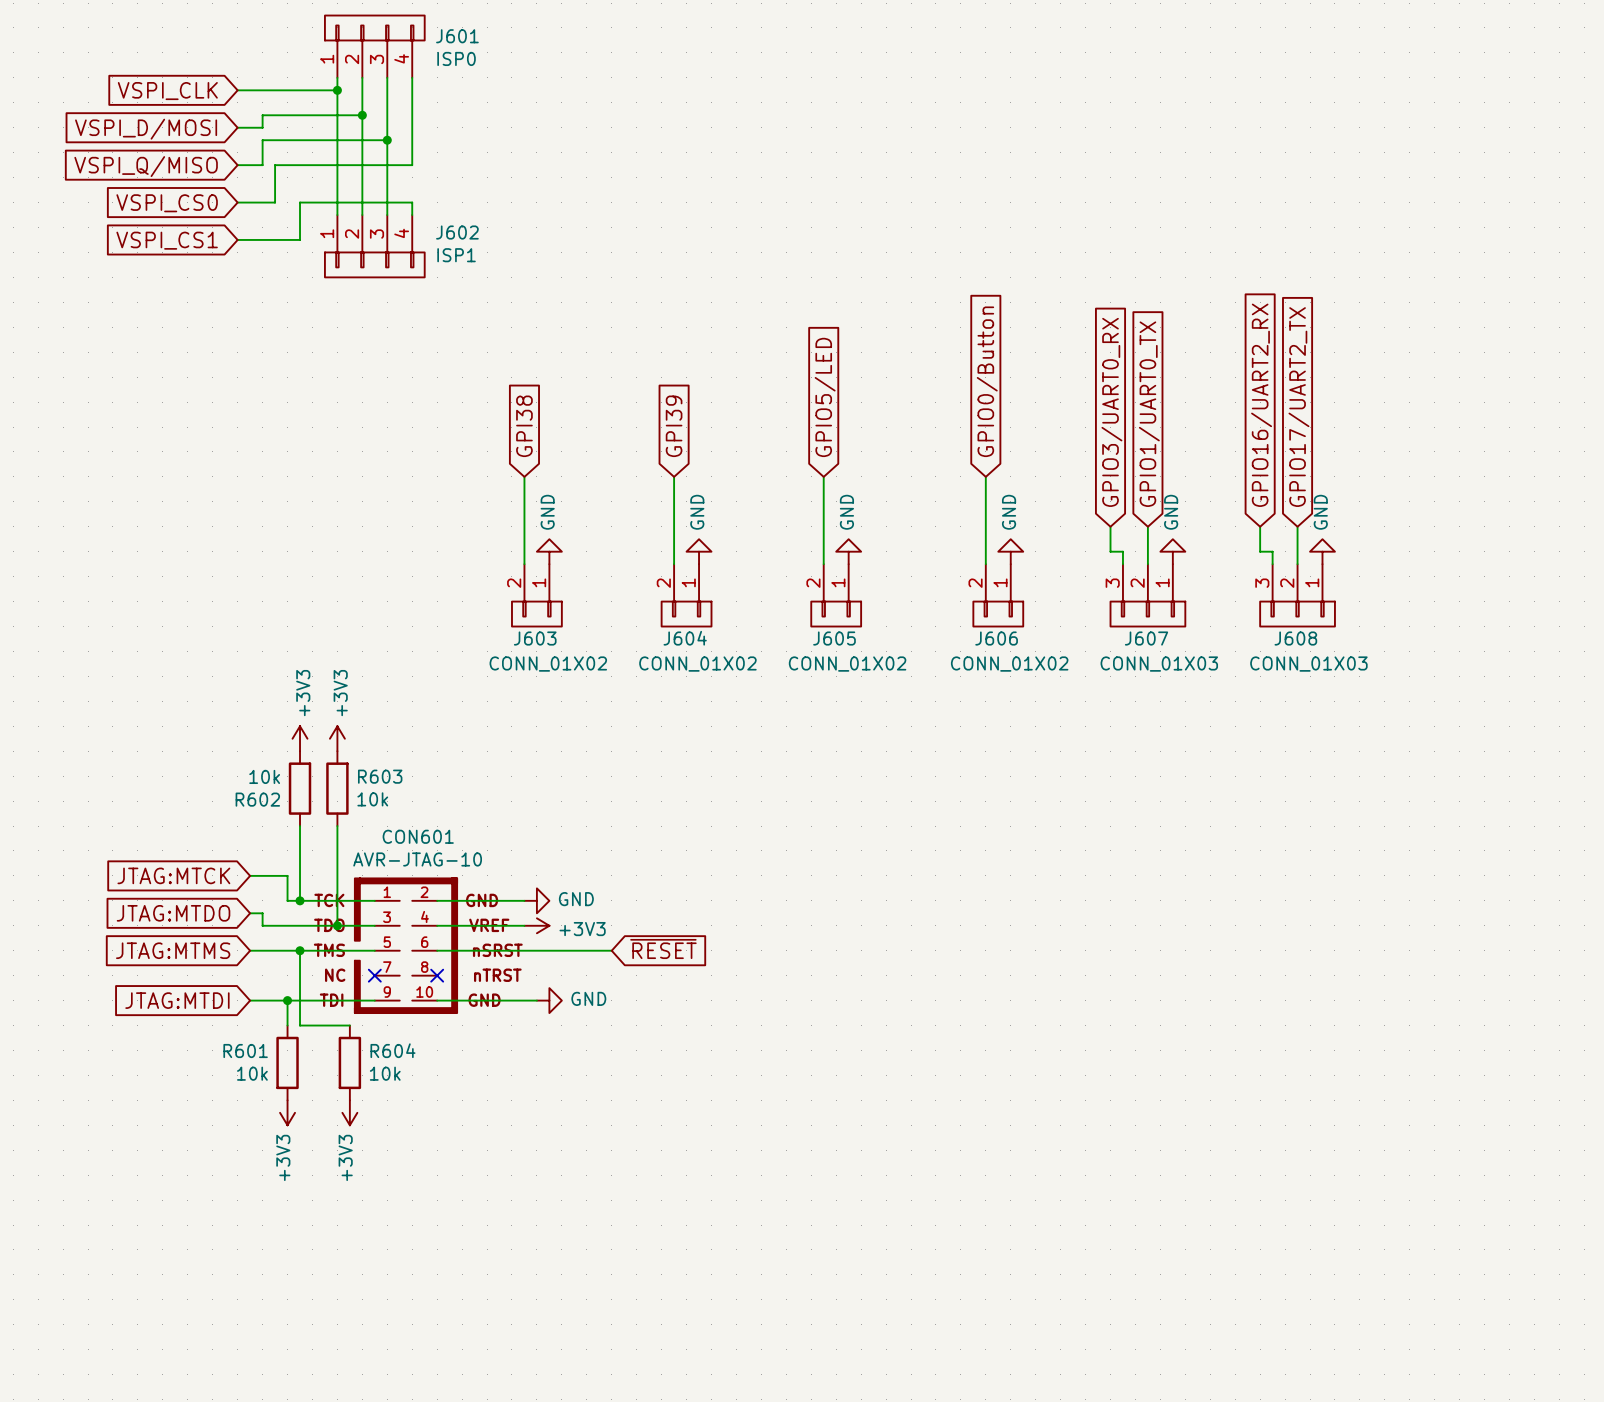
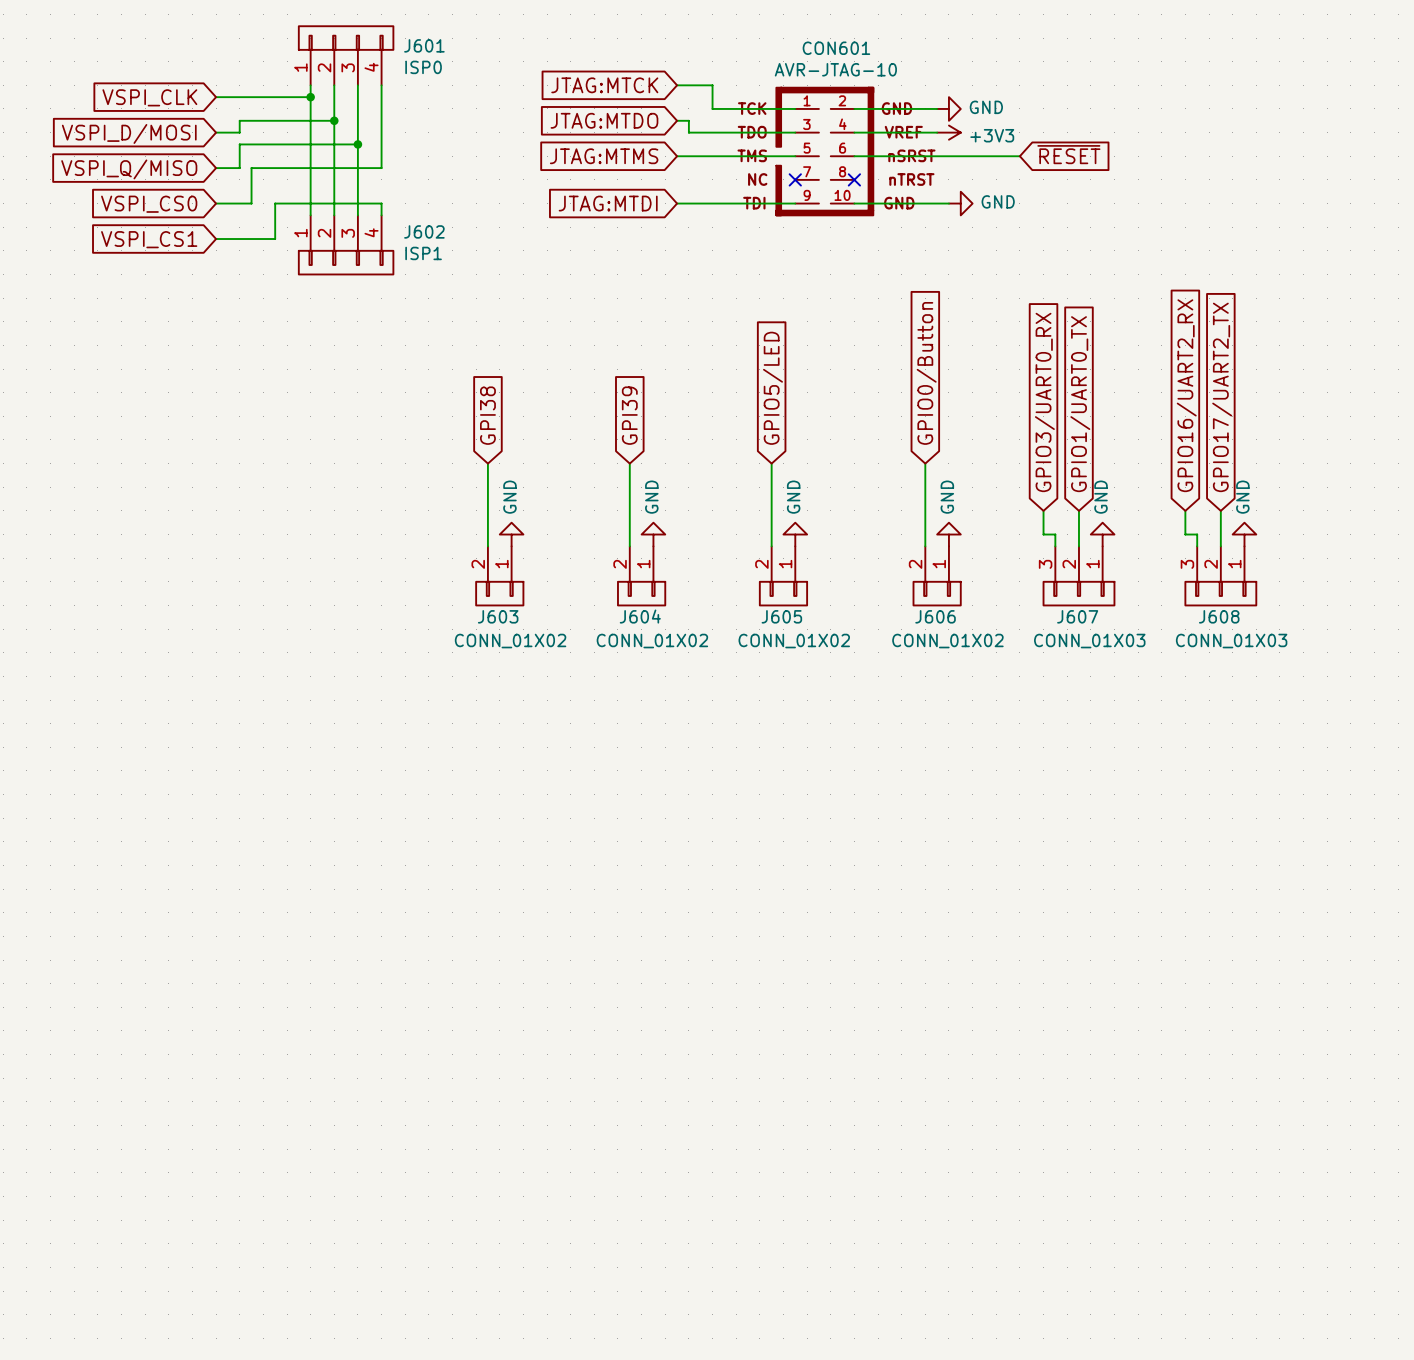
global label: none -> JTAG:MTCK (604, 85)
wire: none -> (677, 85) (712, 85) (712, 108) (795, 108)
wire: none -> (854, 108) (937, 108)
power symbol: none -> GND (948, 108)
global label: none -> JTAG:MTDO (604, 120)
wire: none -> (677, 120) (688, 120) (688, 132) (795, 132)
wire: none -> (854, 132) (937, 132)
power symbol: none -> +3V3 (948, 132)
global label: none -> ~{RESET} (1068, 154)
global label: none -> JTAG:MTMS (604, 156)
wire: none -> (677, 156) (795, 156)
wire: none -> (854, 156) (1019, 156)
no-connect mark: none -> (795, 179)
no-connect mark: none -> (854, 179)
global label: none -> JTAG:MTDI (608, 203)
wire: none -> (677, 203) (795, 203)
wire: none -> (854, 203) (948, 203)
power symbol: none -> GND (960, 203)
power symbol: +3V3 (300, 738) -> none
power symbol: +3V3 (337, 738) -> none
R602: 10k (300, 788) -> none
R603: 10k (337, 788) -> none
wire: (300, 826) (300, 900) -> none
wire: (337, 826) (337, 925) -> none
global label: JTAG:MTCK (173, 875) -> none
wire: (250, 875) (287, 875) (287, 900) (374, 900) -> none
junction: (300, 900) -> none
wire: (437, 900) (524, 900) -> none
power symbol: GND (536, 900) -> none
global label: JTAG:MTDO (173, 913) -> none
wire: (250, 913) (262, 913) (262, 925) (374, 925) -> none
junction: (337, 925) -> none
wire: (437, 925) (524, 925) -> none
power symbol: +3V3 (536, 925) -> none
CON601 position: (405, 945) -> (824, 151)
global label: ~{RESET} (663, 949) -> none
global label: JTAG:MTMS (173, 950) -> none
wire: (250, 950) (374, 950) -> none
wire: (300, 950) (300, 1025) (349, 1025) -> none
junction: (300, 950) -> none
wire: (437, 950) (611, 950) -> none
no-connect mark: (374, 975) -> none
no-connect mark: (437, 975) -> none
global label: JTAG:MTDI (177, 1000) -> none
wire: (250, 1000) (374, 1000) -> none
wire: (287, 1000) (287, 1025) -> none
junction: (287, 1000) -> none
wire: (437, 1000) (536, 1000) -> none
power symbol: GND (549, 1000) -> none
R601: 10k (287, 1062) -> none
R604: 10k (349, 1062) -> none
power symbol: +3V3 (287, 1112) -> none
power symbol: +3V3 (349, 1112) -> none

